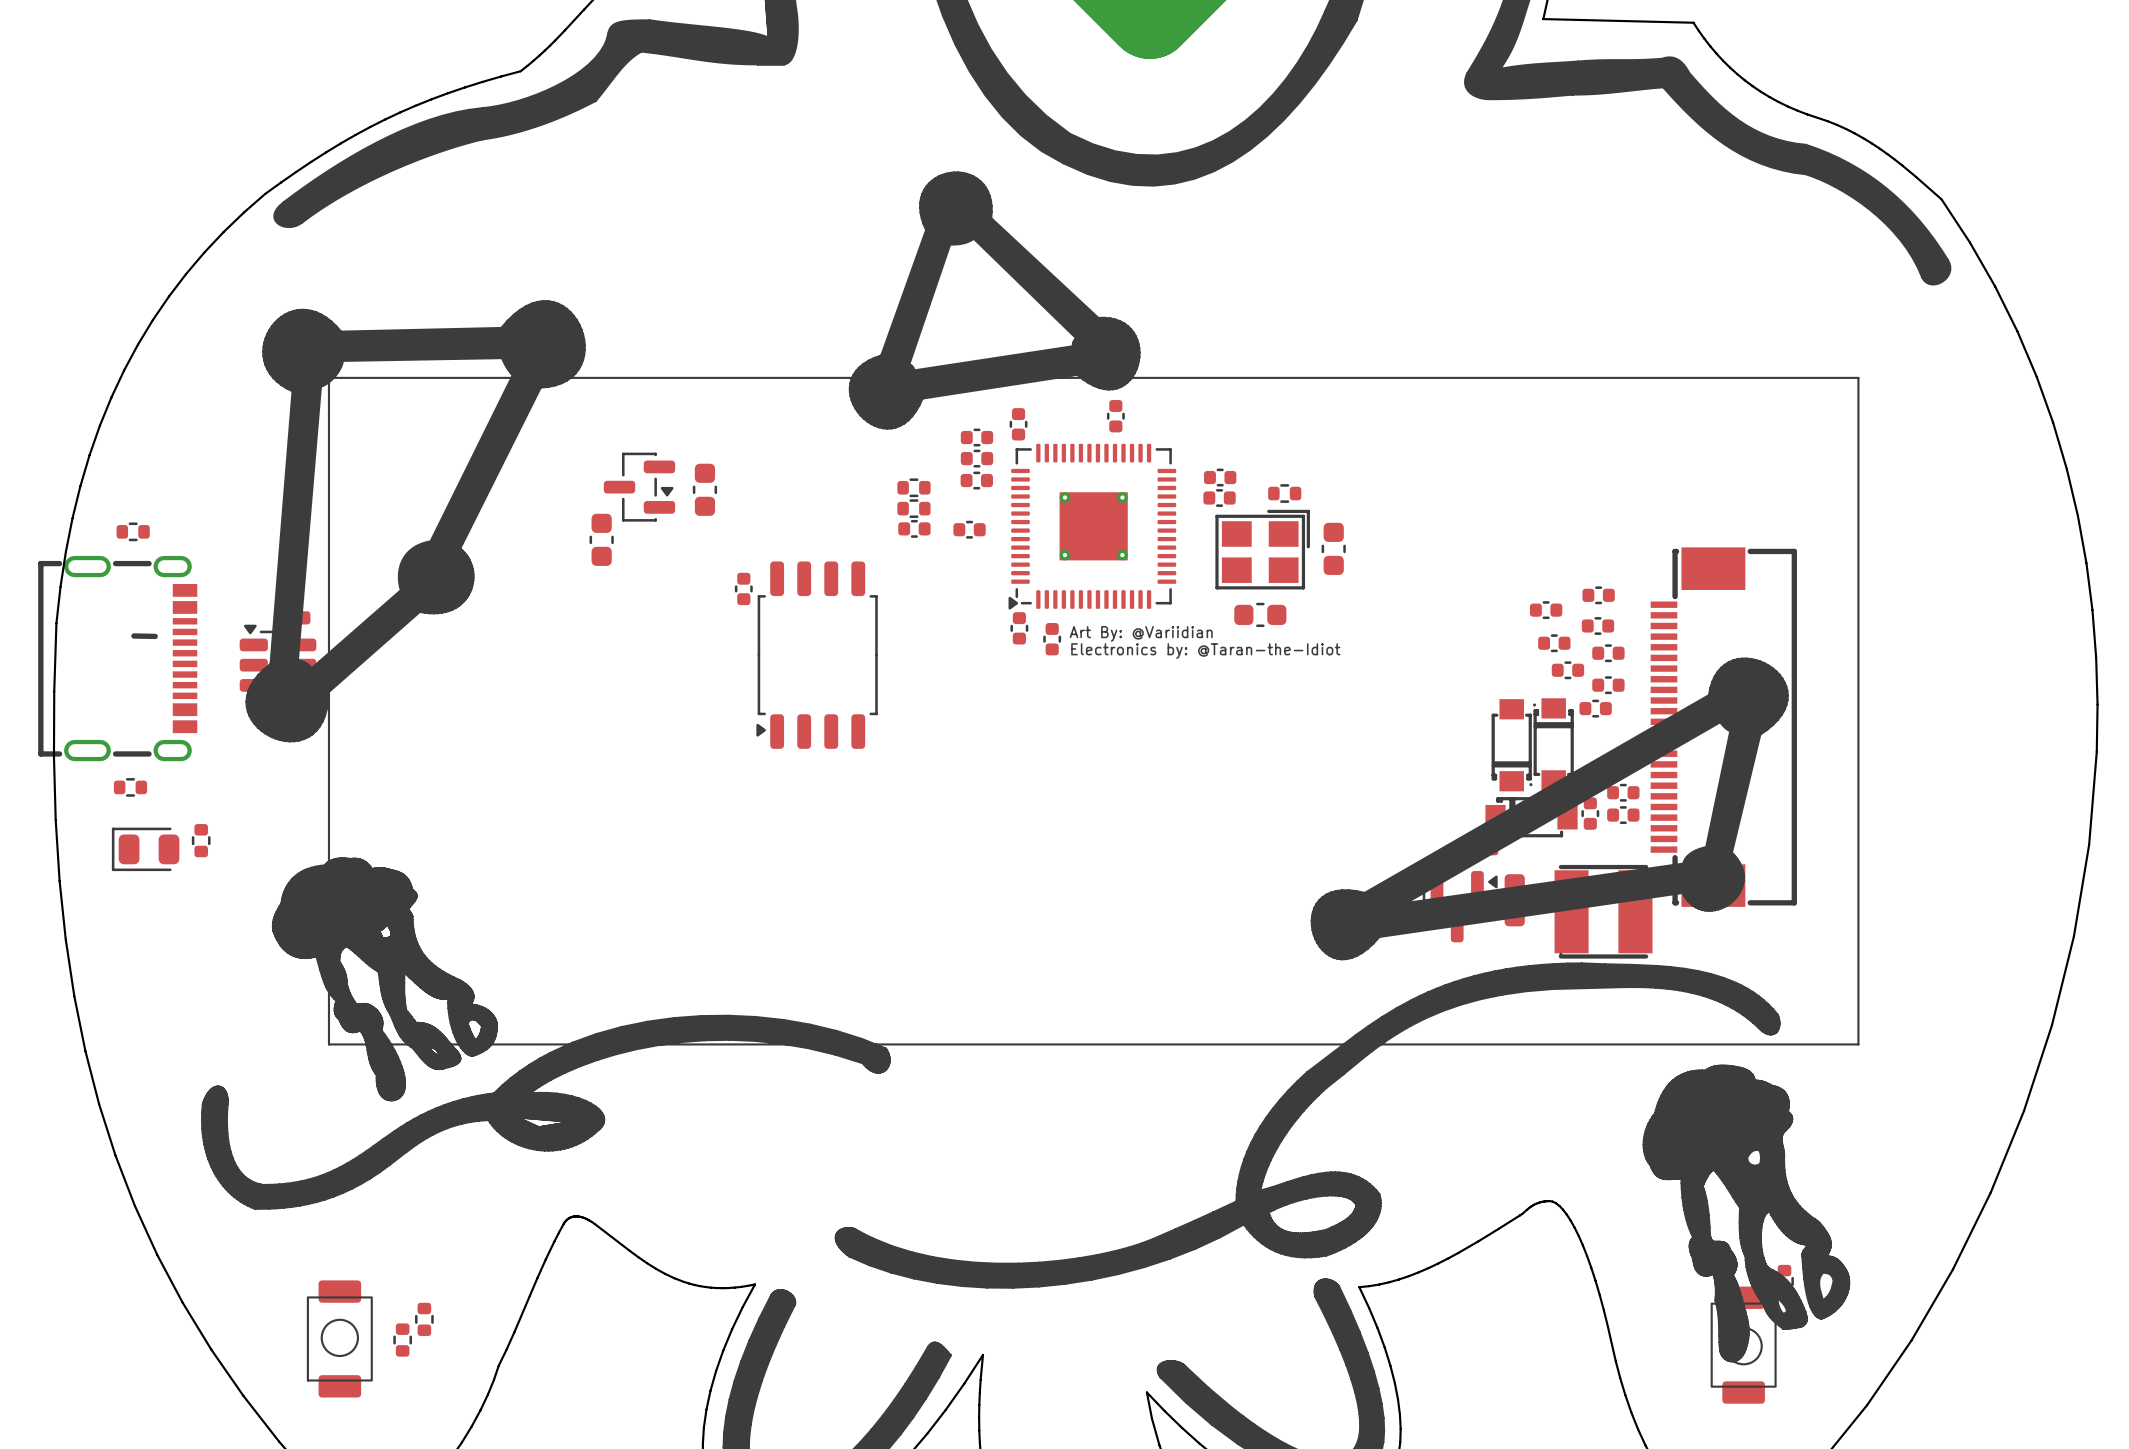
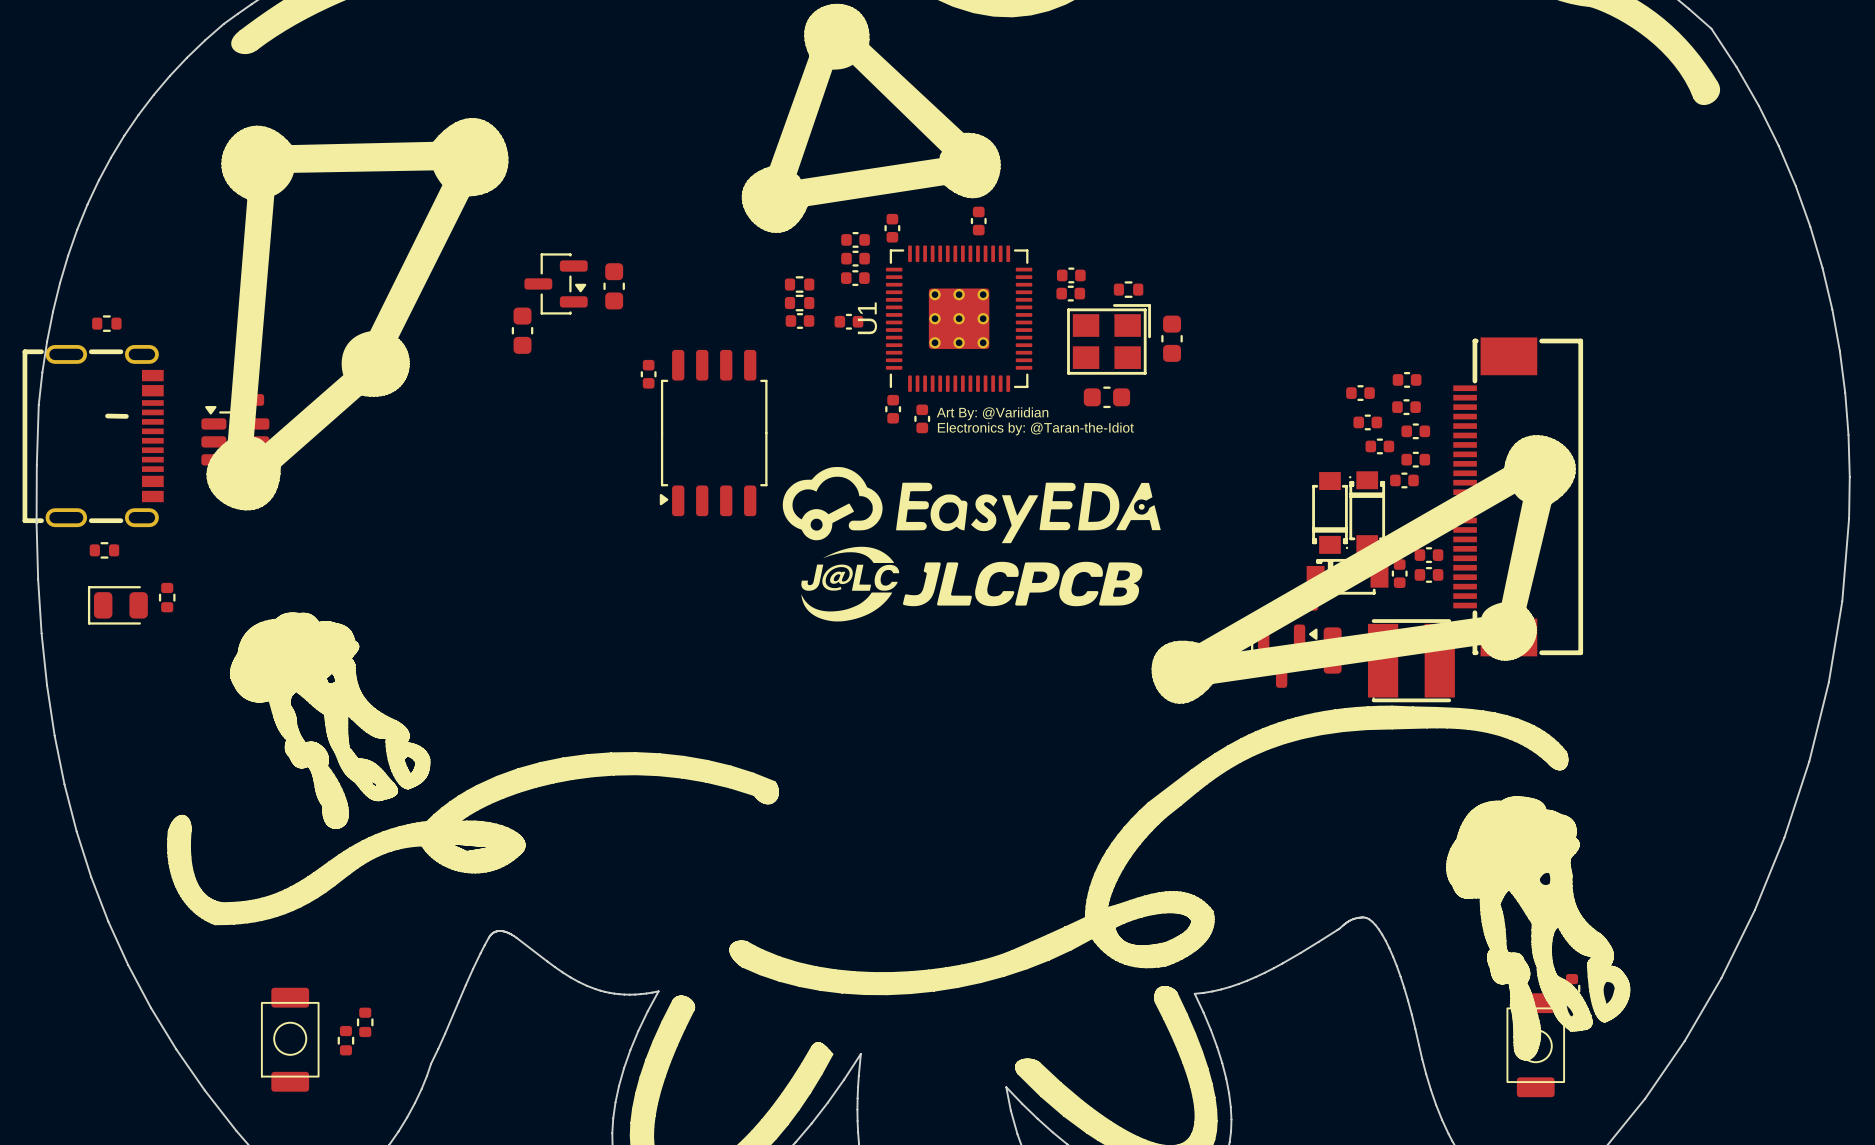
line: (328, 377) (1858, 377) (1858, 1044) (328, 1044) (328, 377) -> none
part: (1092, 526) -> none
U1: none -> (959, 318)
drawing: none -> [782, 467, 1161, 622]

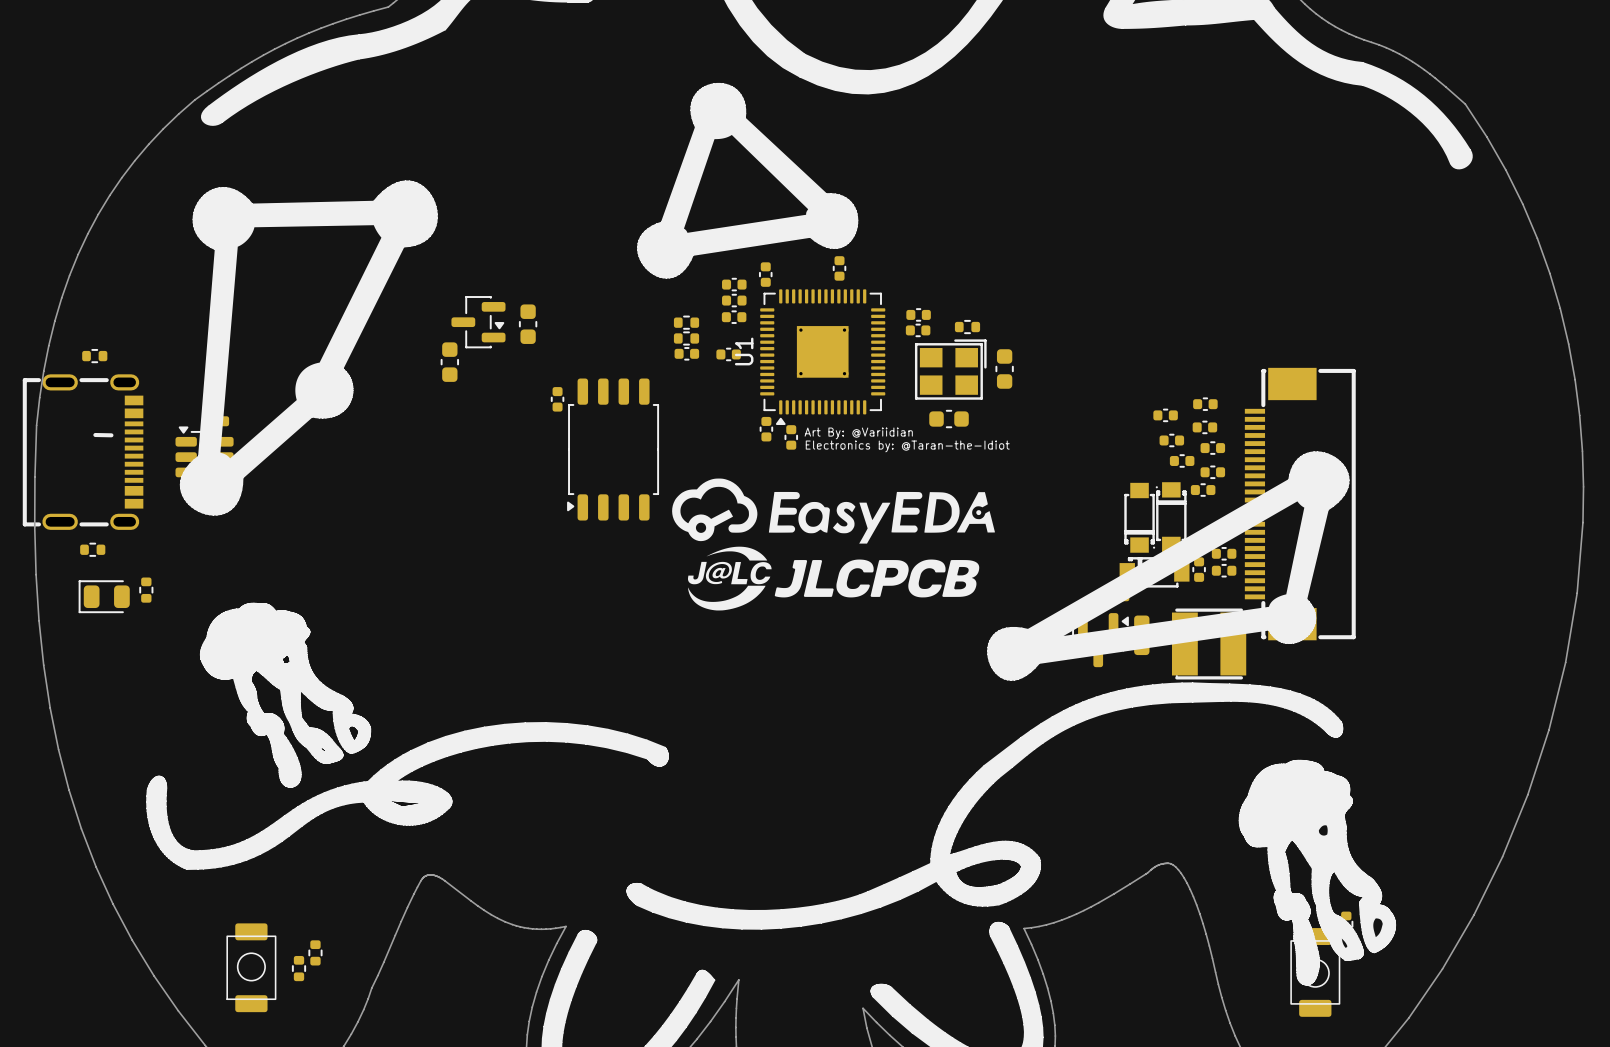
U1 footprint: [885, 245, 1033, 392] -> [760, 289, 886, 425]

